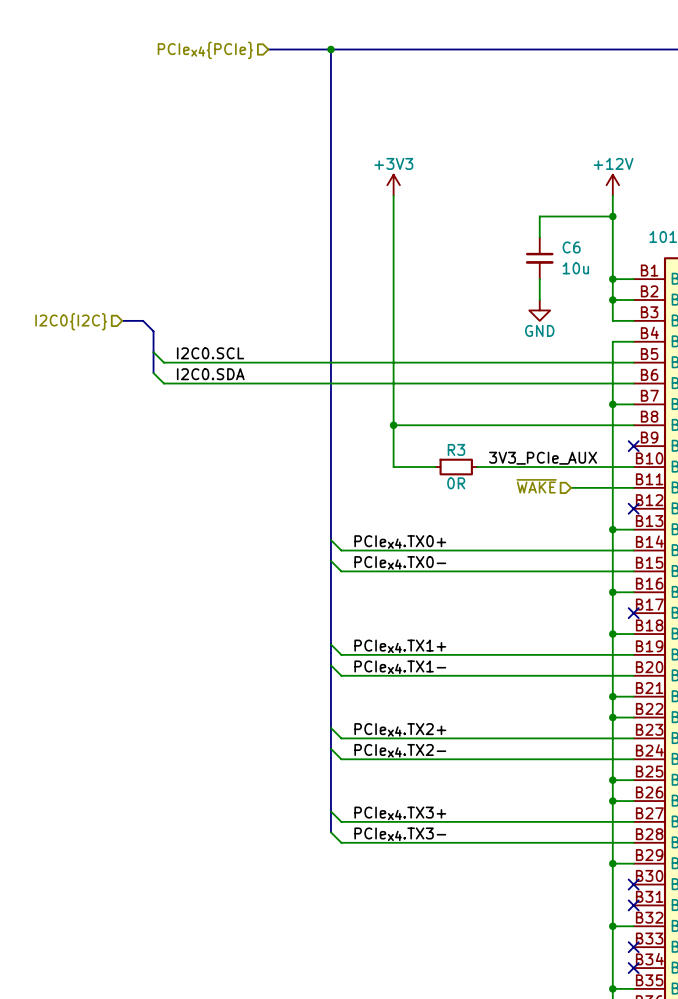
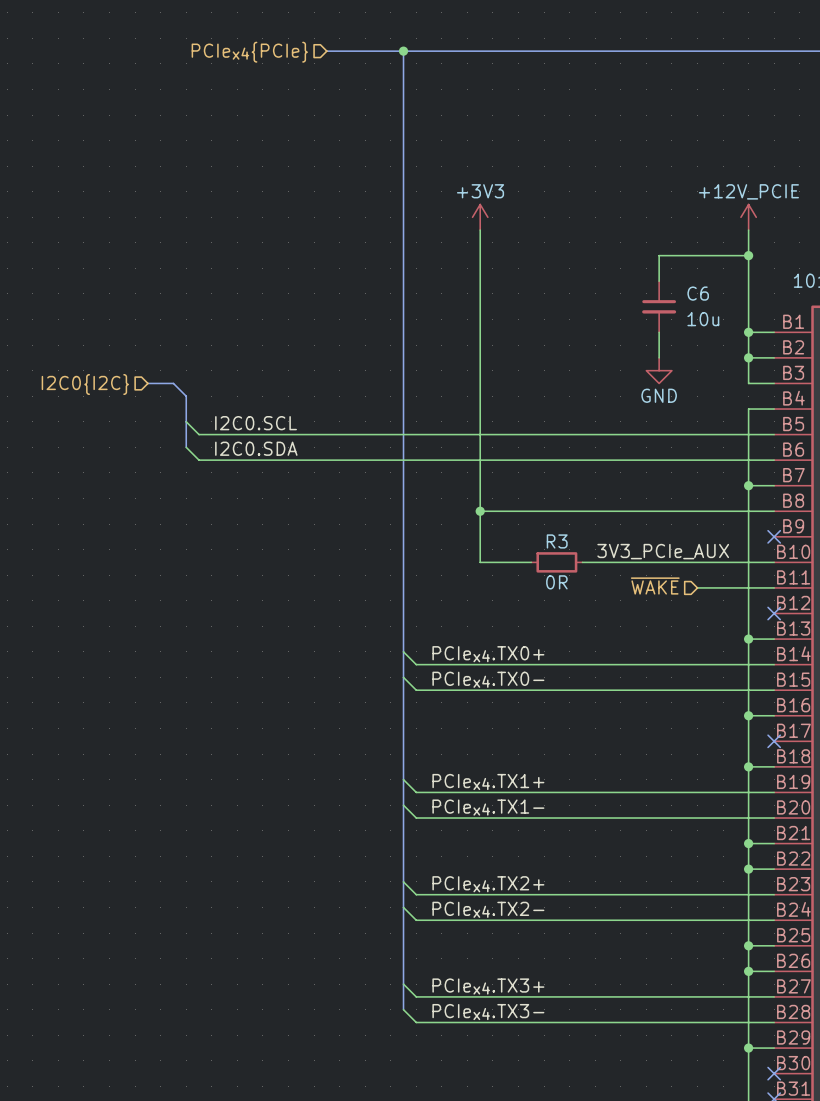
power symbol: +12V (612, 185) -> +12V_PCIE (748, 217)

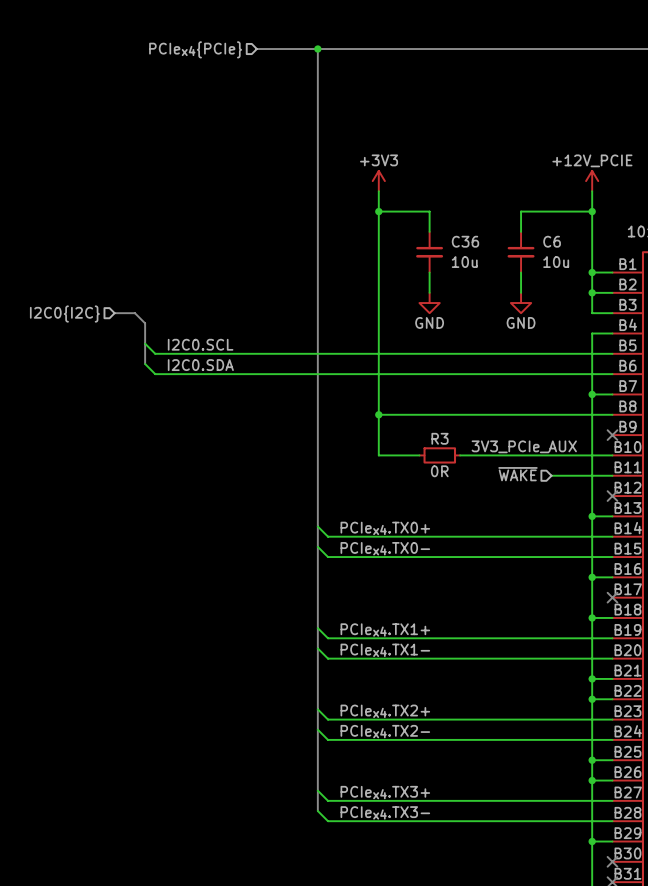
wire: none -> (378, 211) (429, 211) (429, 231)
junction: none -> (378, 211)
C36: none -> (429, 252)
wire: none -> (429, 272) (429, 292)
power symbol: none -> GND (429, 303)

